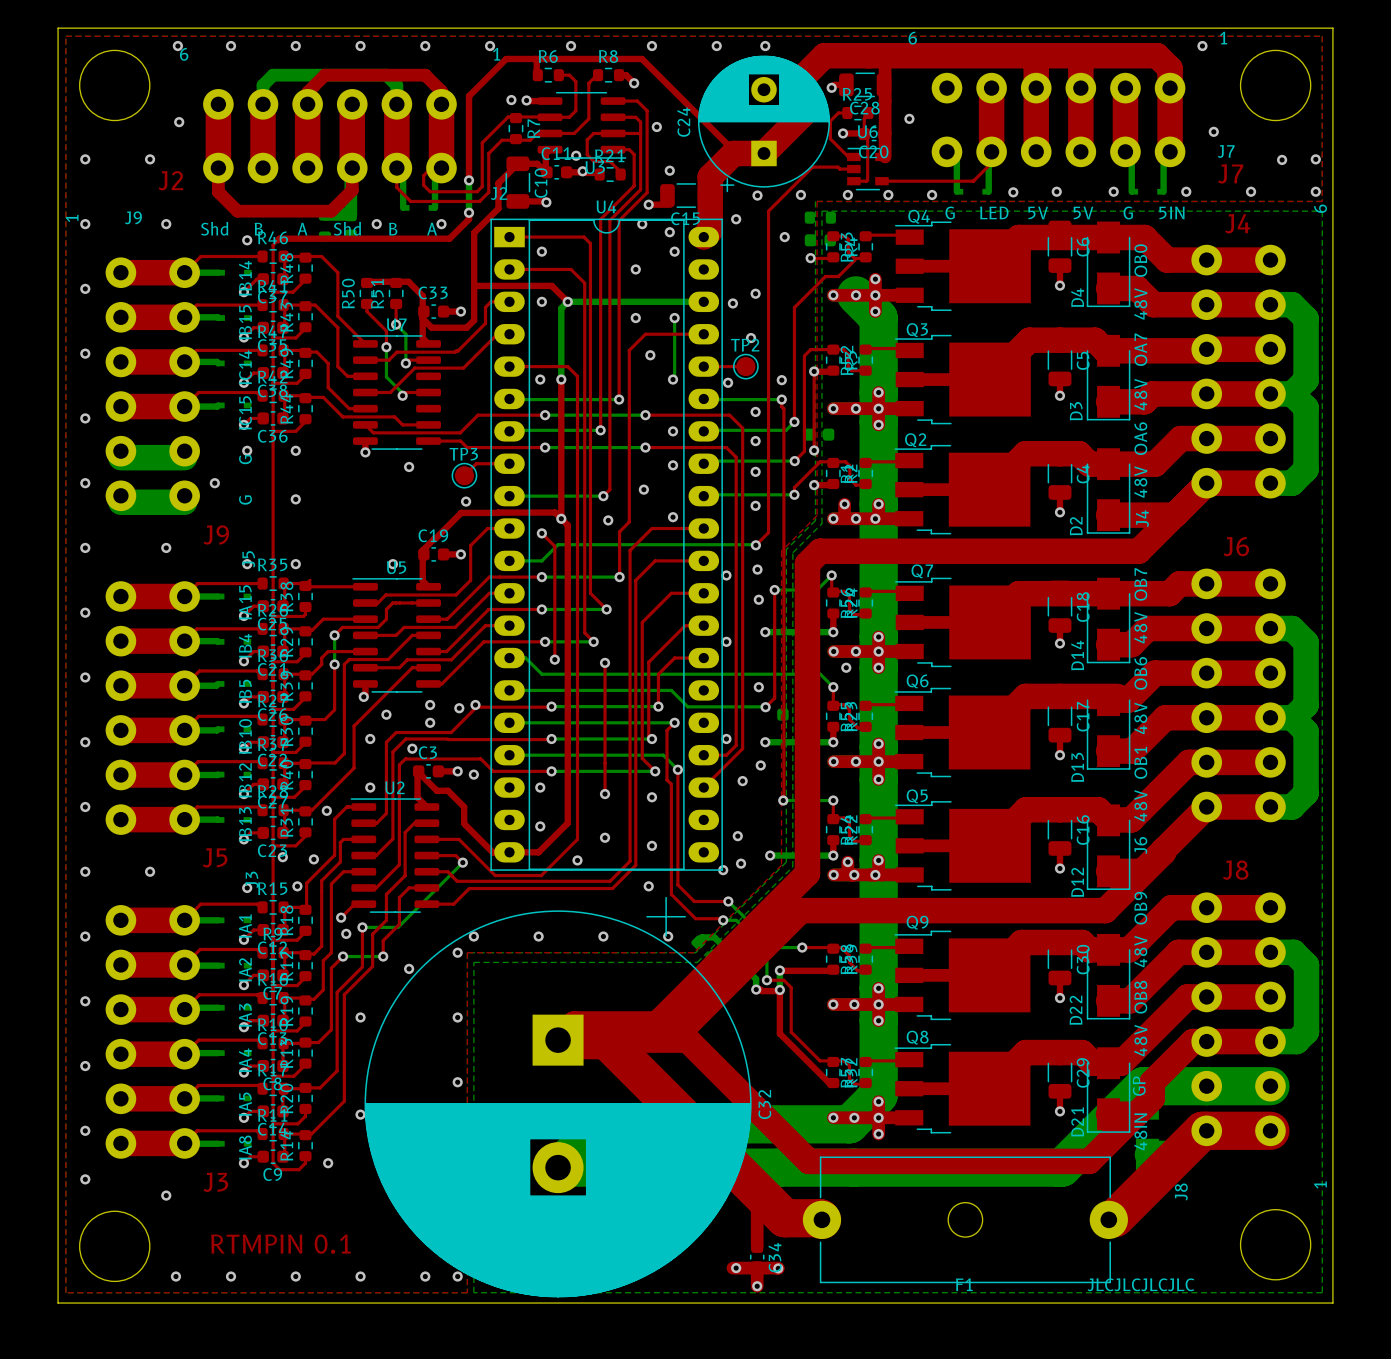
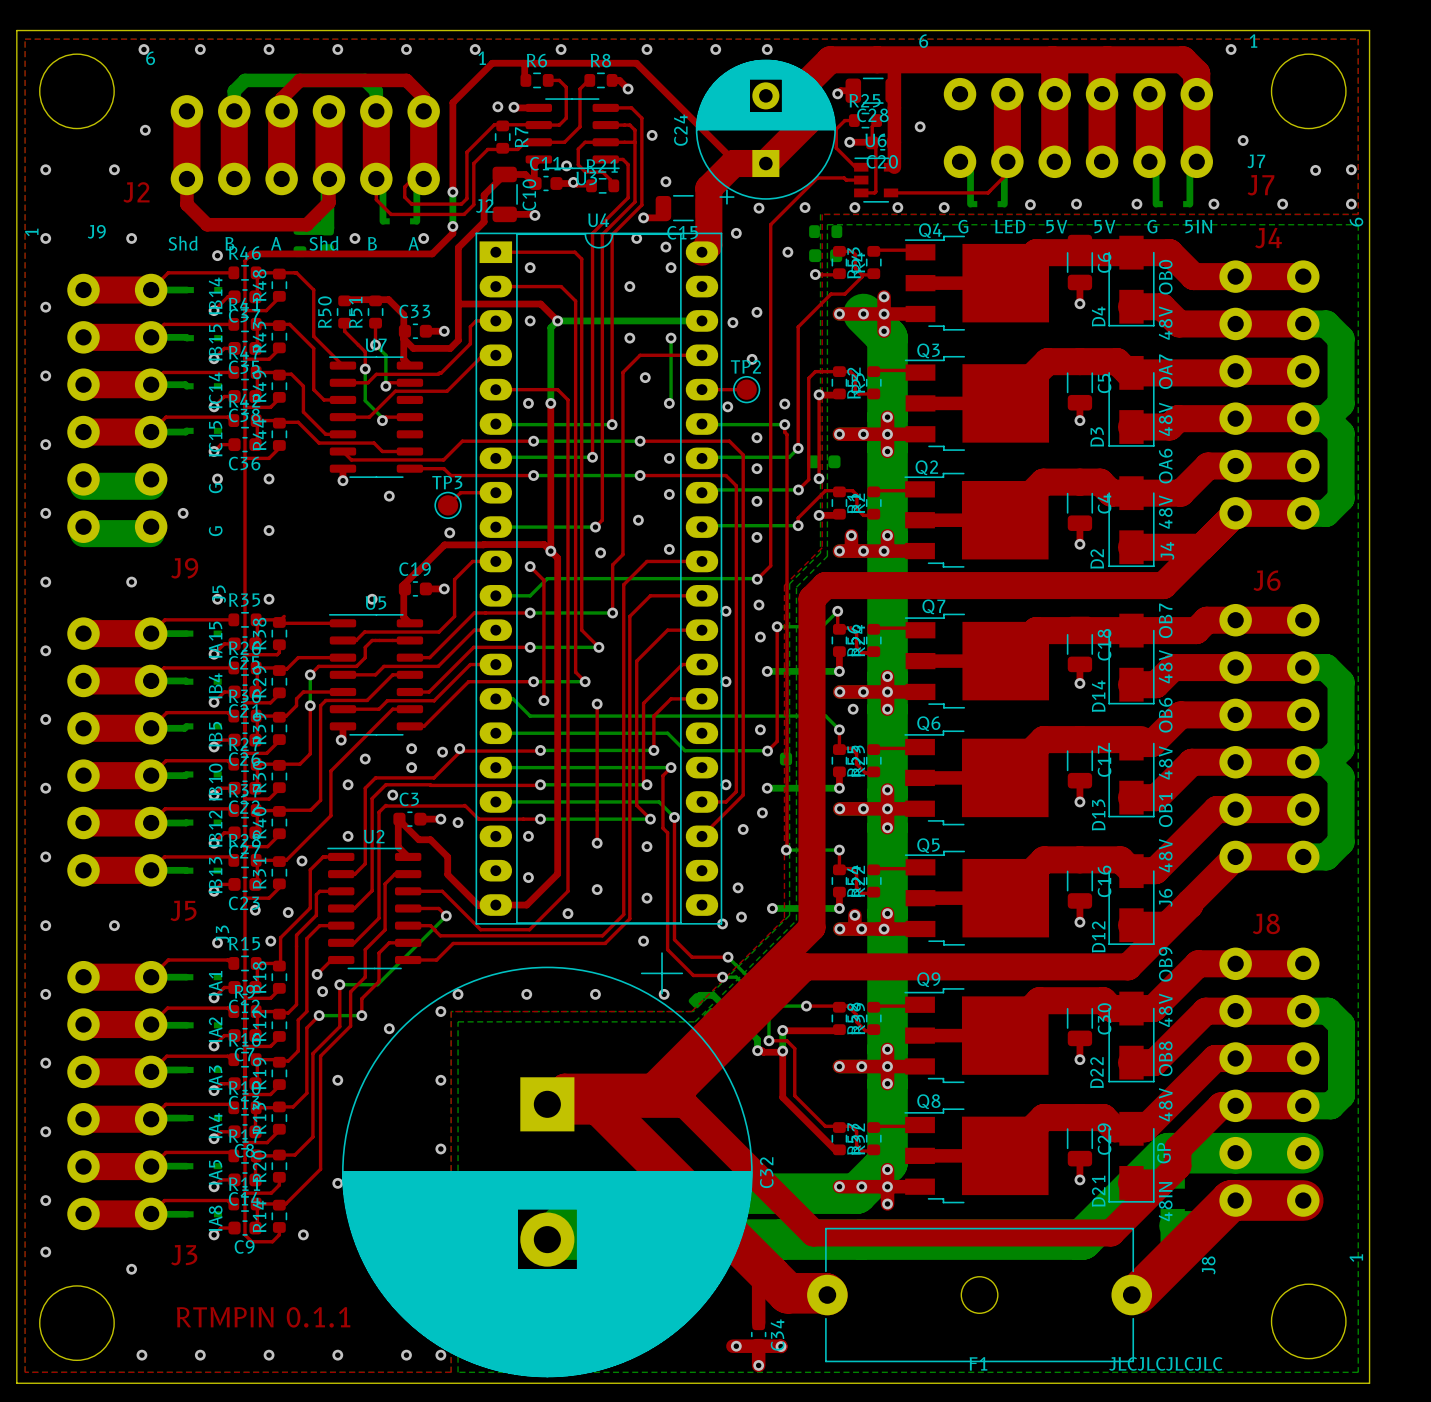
text: RTMPIN 0.1 (280, 1244) -> RTMPIN 0.1.1 (263, 1317)

